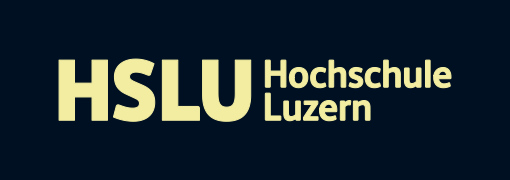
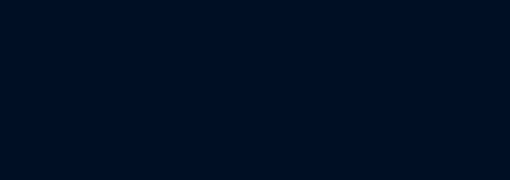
drawing: [58, 58, 452, 122] -> none

